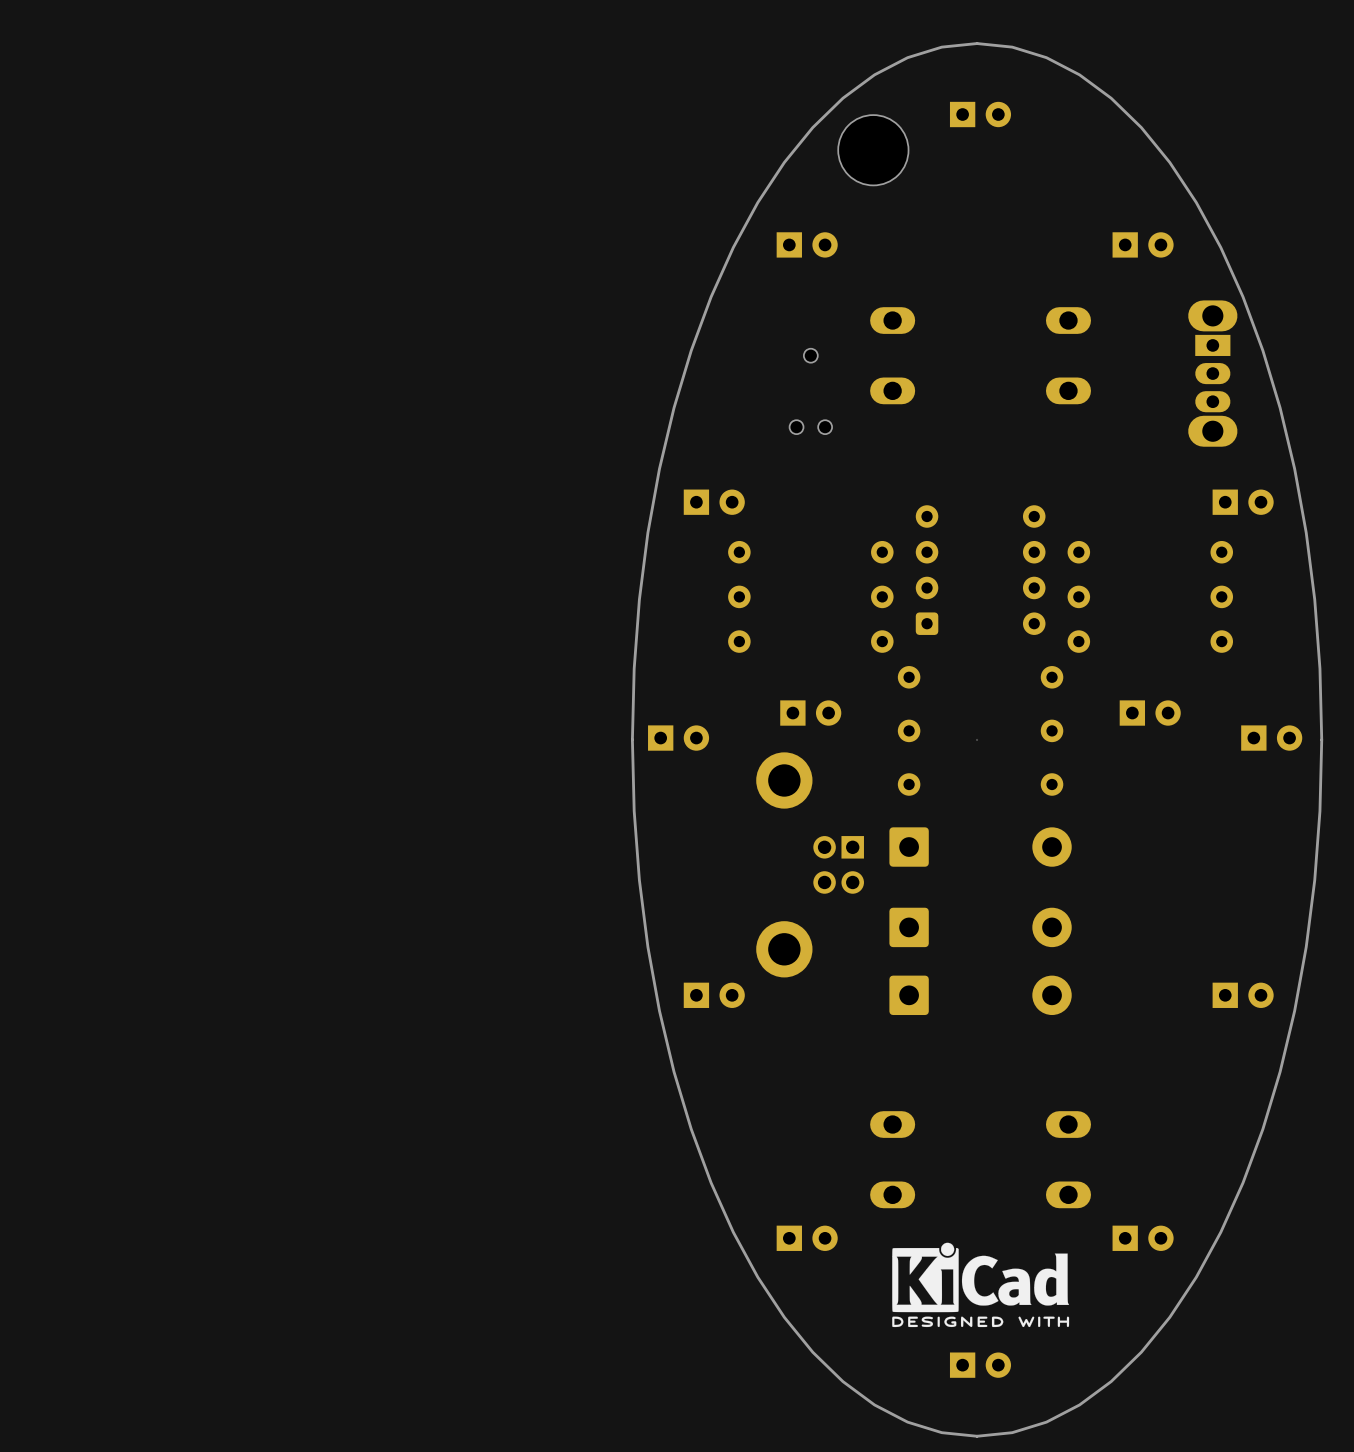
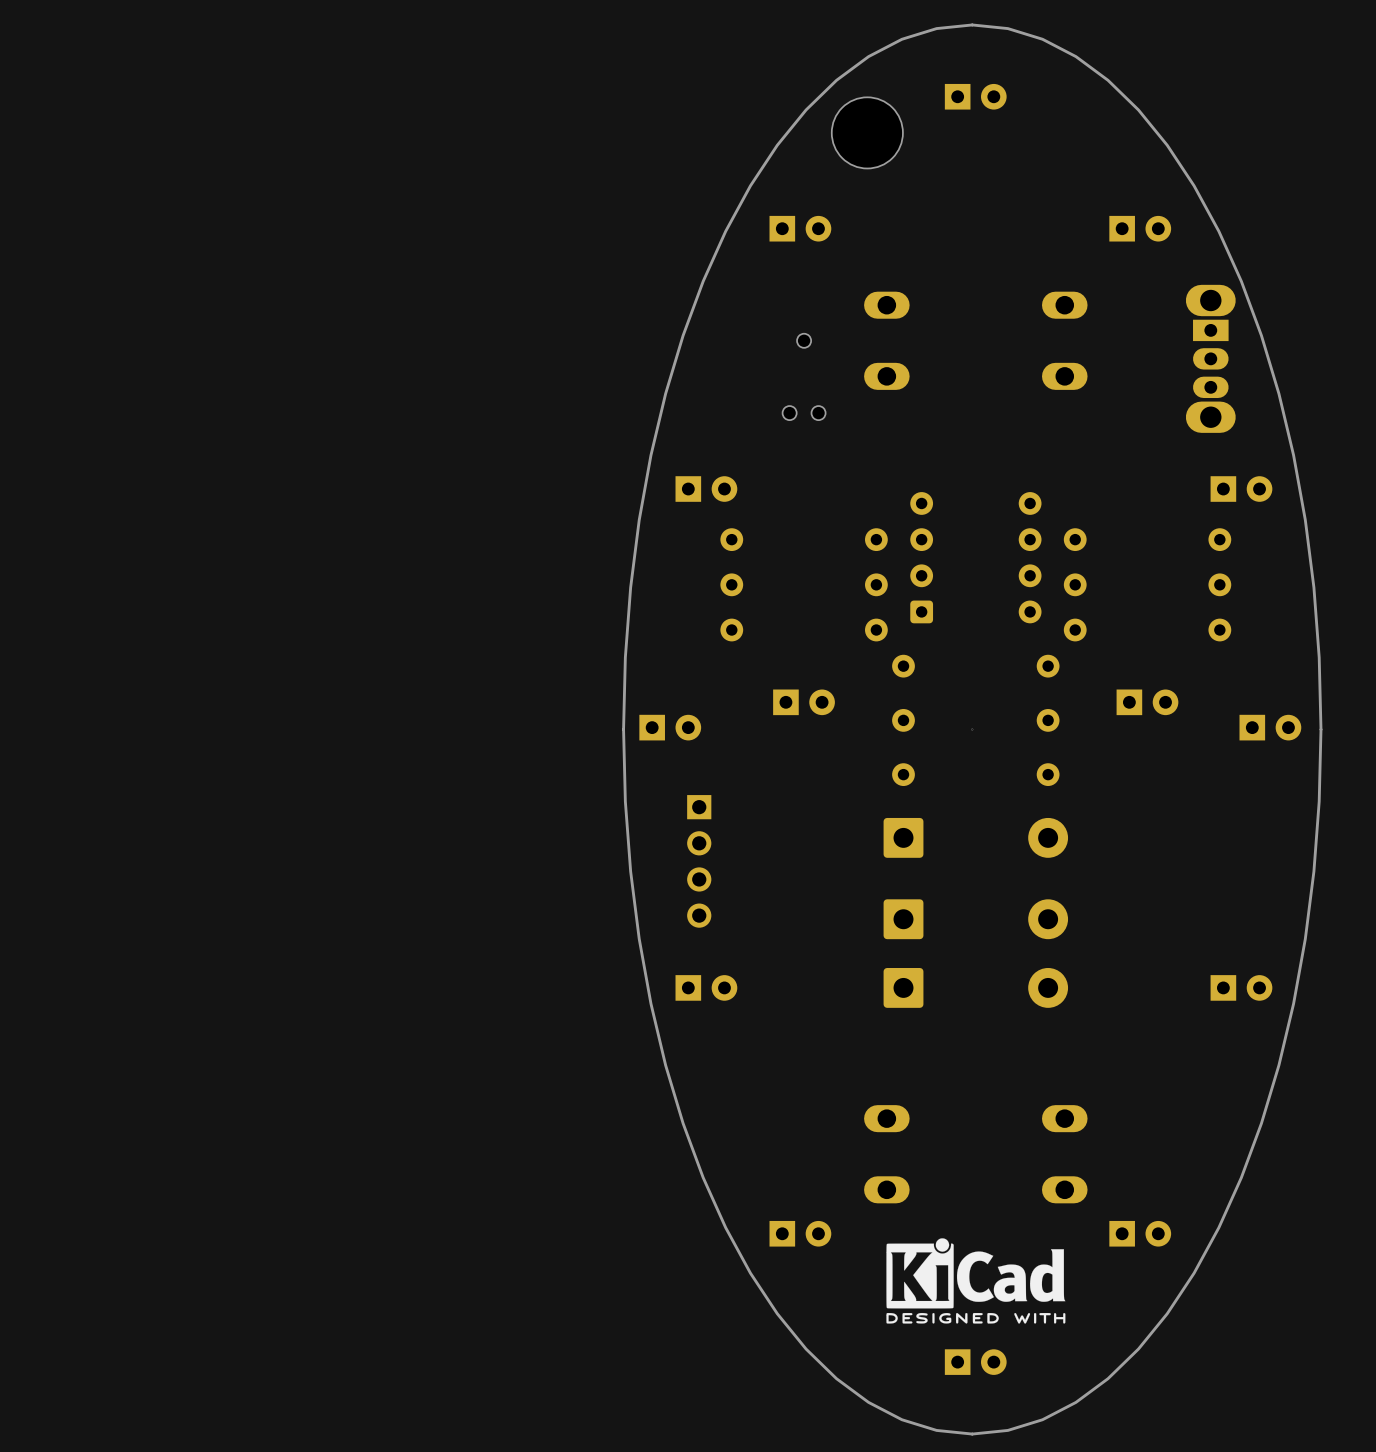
part: (810, 864) -> none
part: none -> (699, 861)

